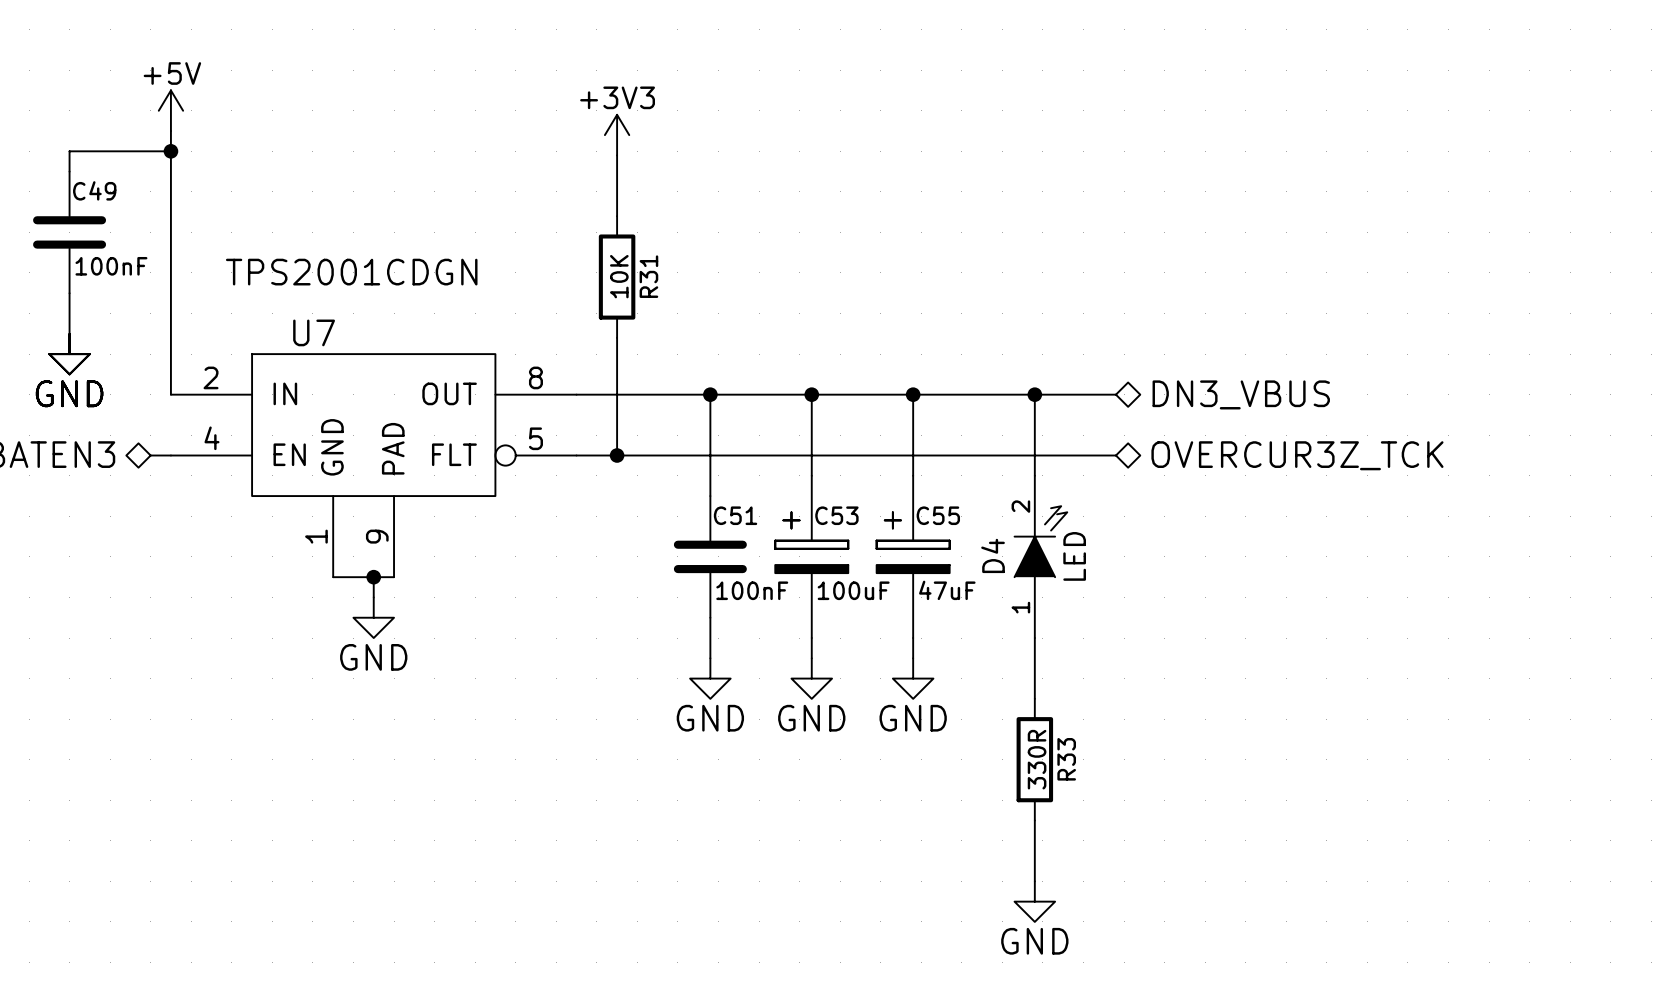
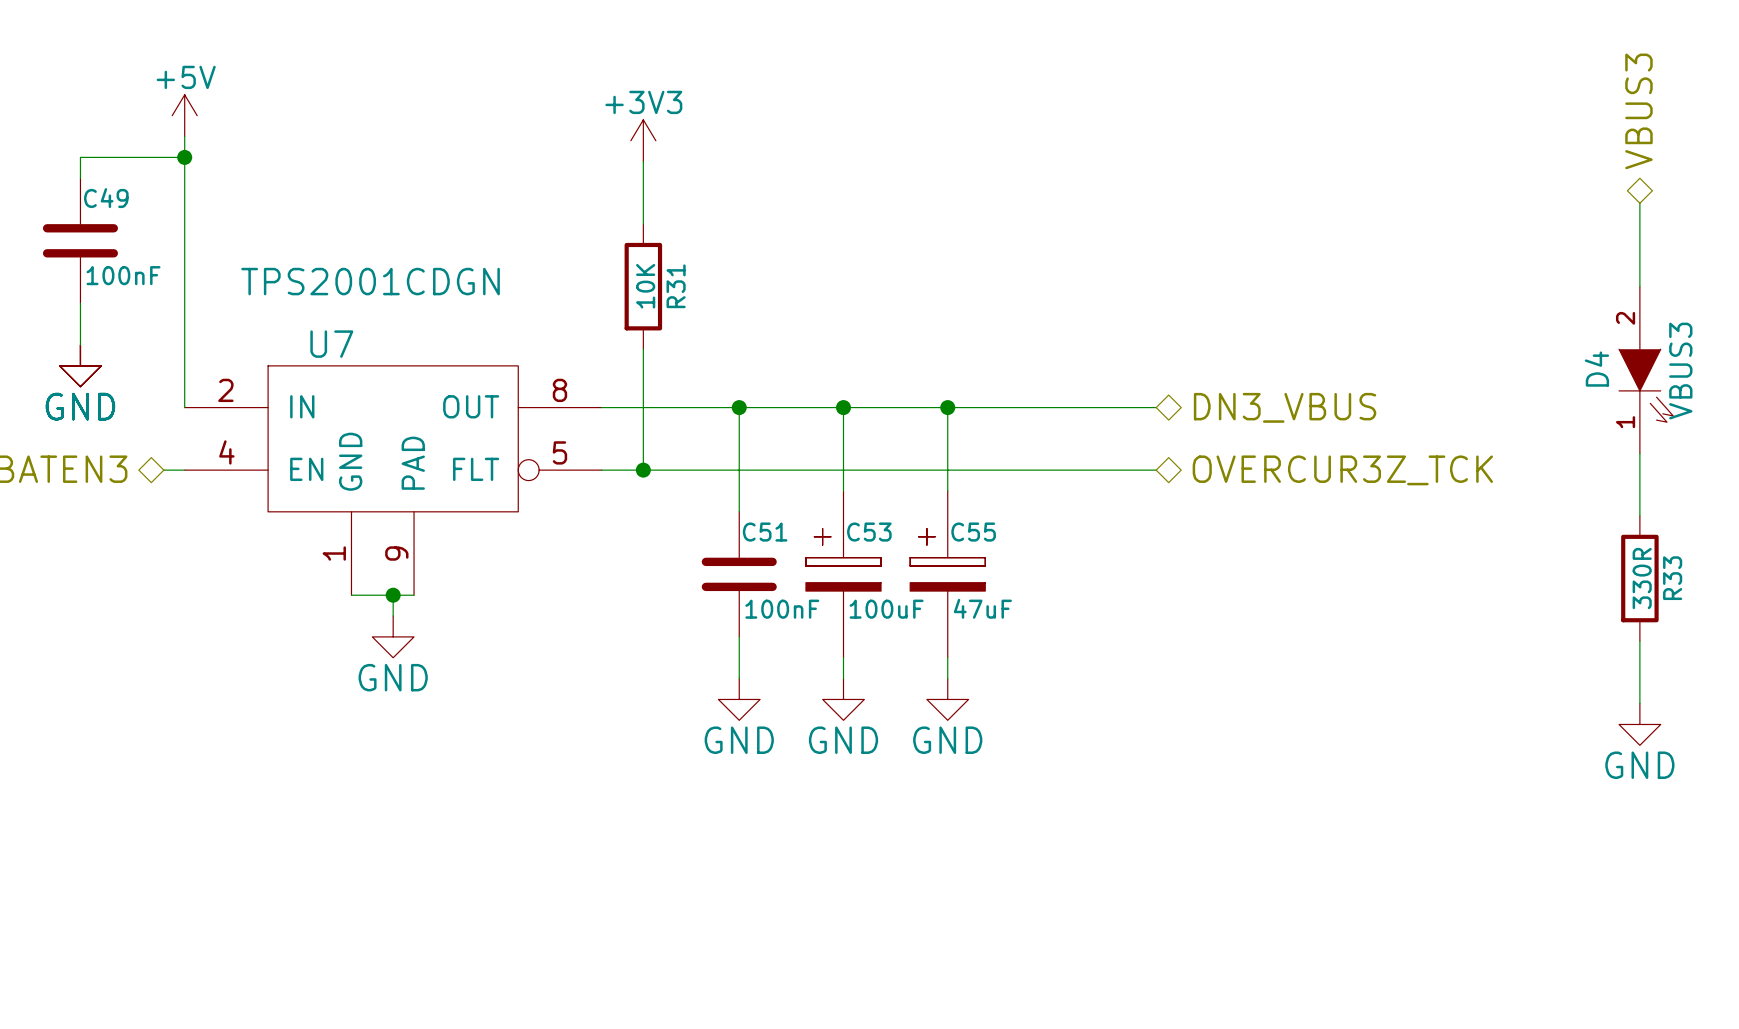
hierarchical label: none -> VBUS3 (1638, 111)
wire: none -> (1639, 203) (1639, 286)
wire: (1034, 394) (1034, 475) -> none
junction: (1034, 394) -> none
wire: none -> (1639, 453) (1639, 515)
D4 symbol: [1014, 475, 1068, 639] -> [1619, 286, 1674, 454]
D4 value: LED (1074, 556) -> VBUS3 (1680, 371)
wire: none -> (1639, 641) (1639, 703)
wire: (1034, 638) (1034, 698) -> none
power symbol: none -> GND (1639, 724)
R33 position: (1034, 759) -> (1639, 578)
wire: (1034, 820) (1034, 881) -> none
power symbol: GND (1034, 901) -> none

